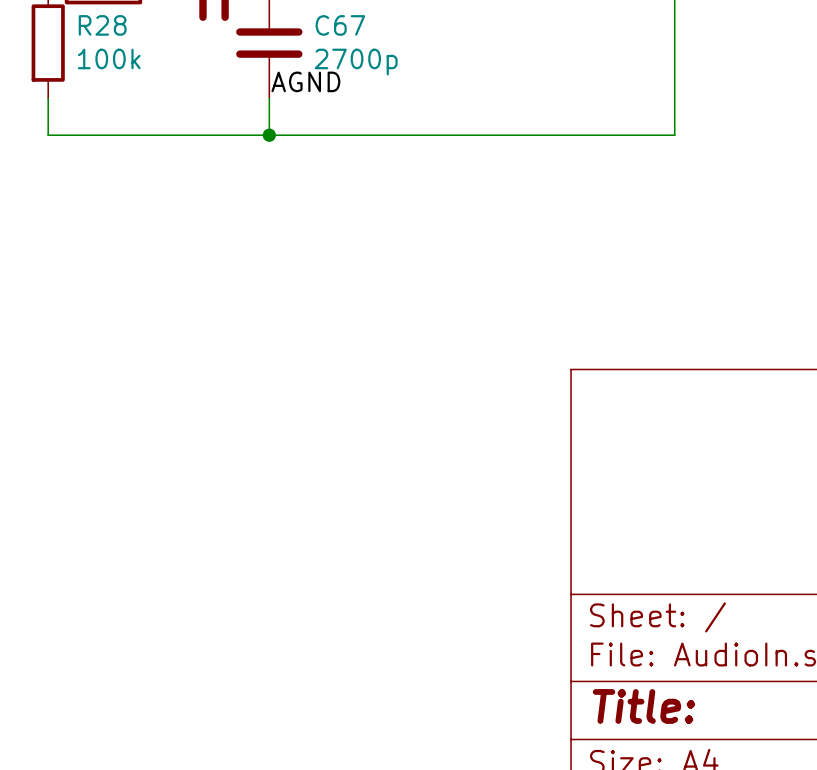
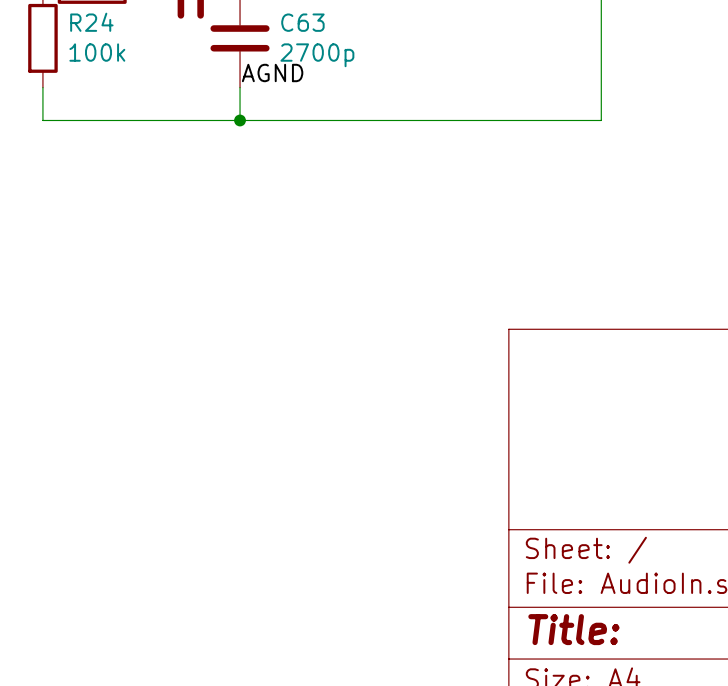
R28 name: R28 (102, 25) -> R24 (91, 22)
C67 name: C67 (340, 25) -> C63 (302, 22)

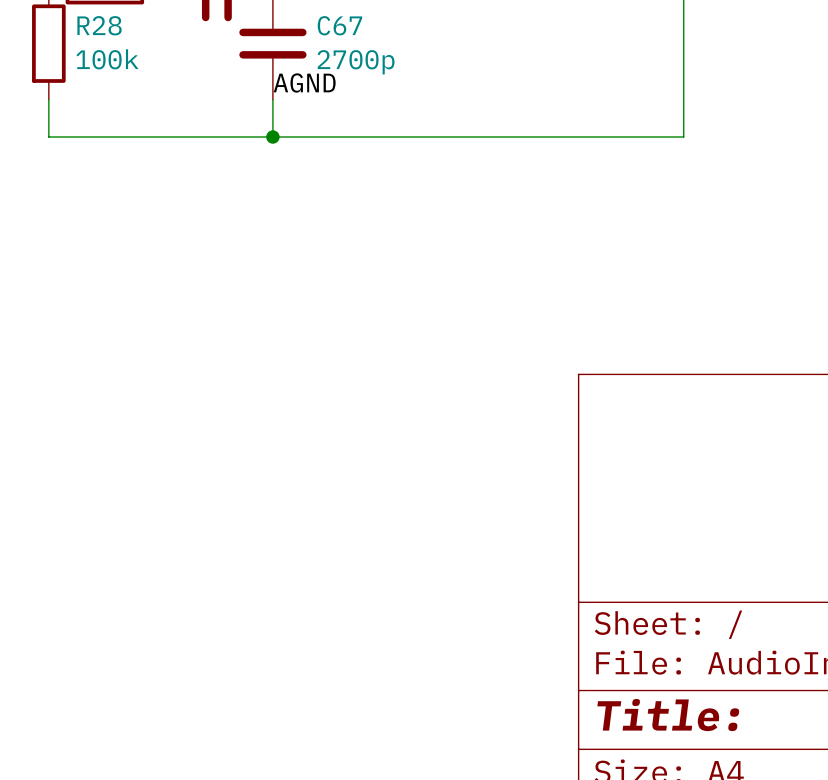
R24 name: R24 (91, 22) -> R28 (99, 25)
C63 name: C63 (302, 22) -> C67 (339, 25)

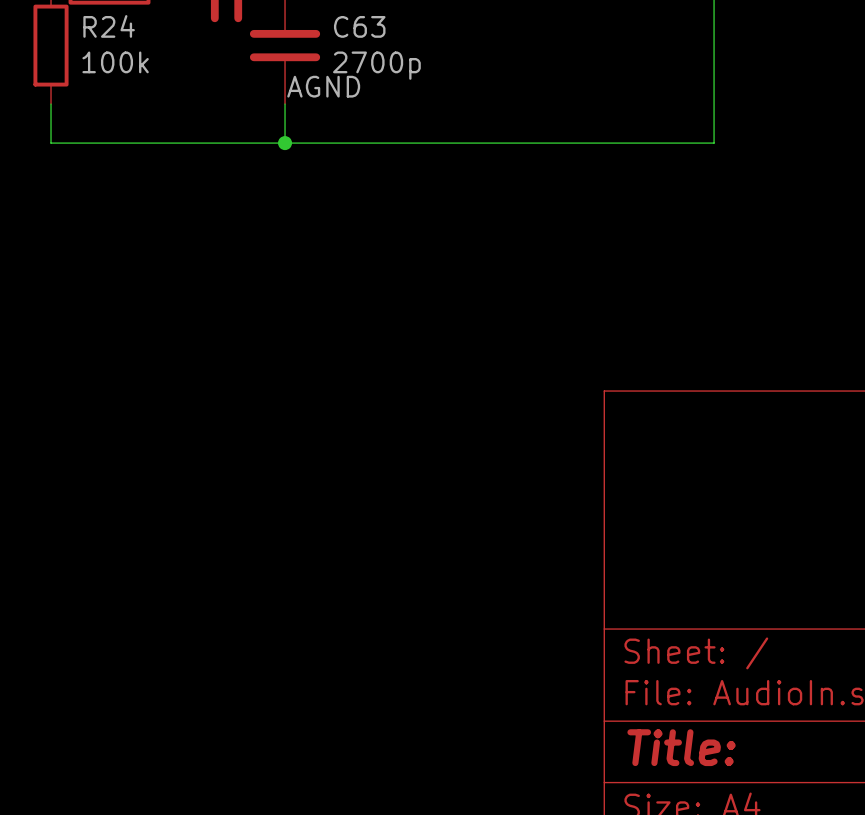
R28 name: R28 (99, 25) -> R24 (109, 26)
C67 name: C67 (339, 25) -> C63 (359, 26)

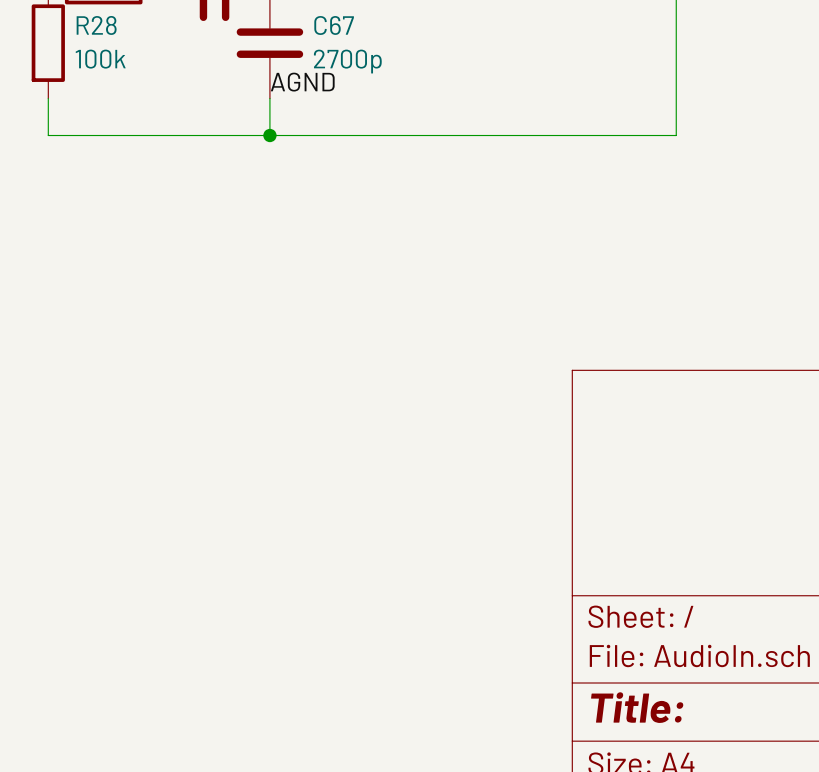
R24 name: R24 (109, 26) -> R28 (96, 25)
C63 name: C63 (359, 26) -> C67 (334, 25)

